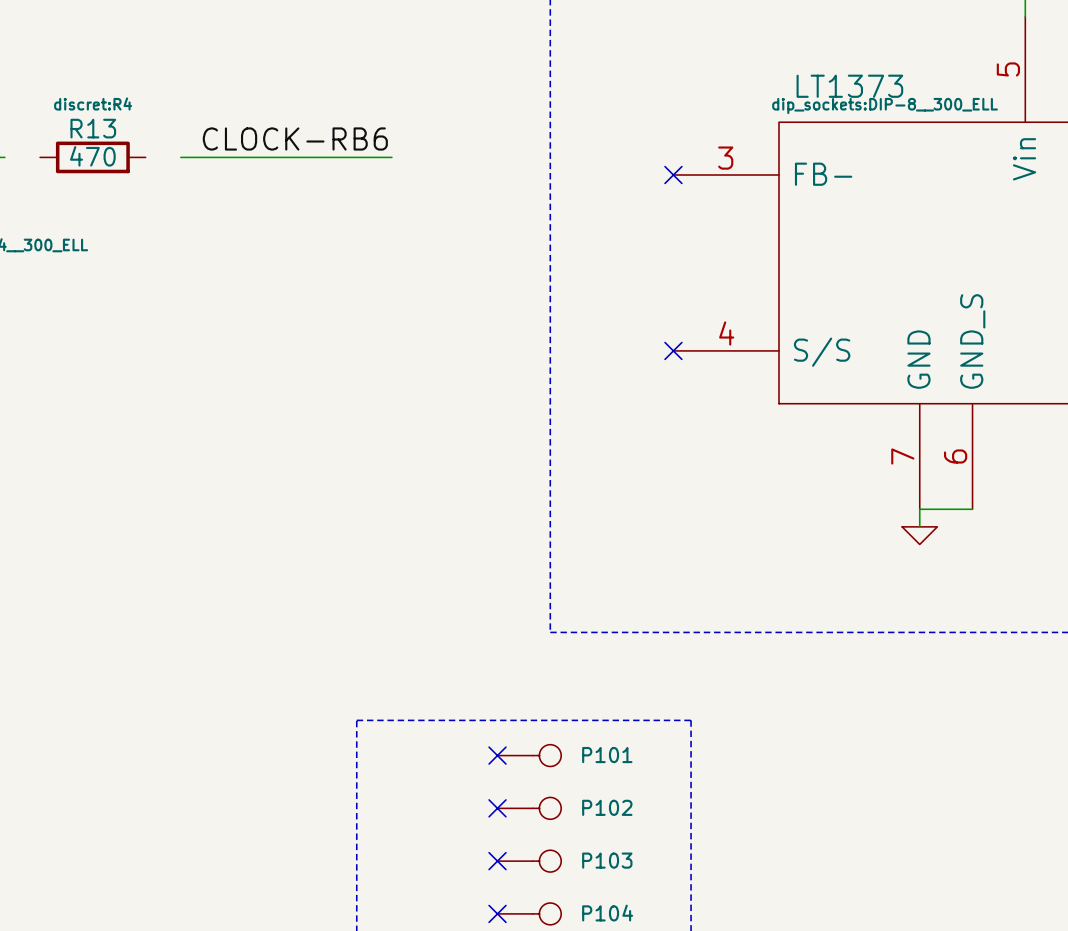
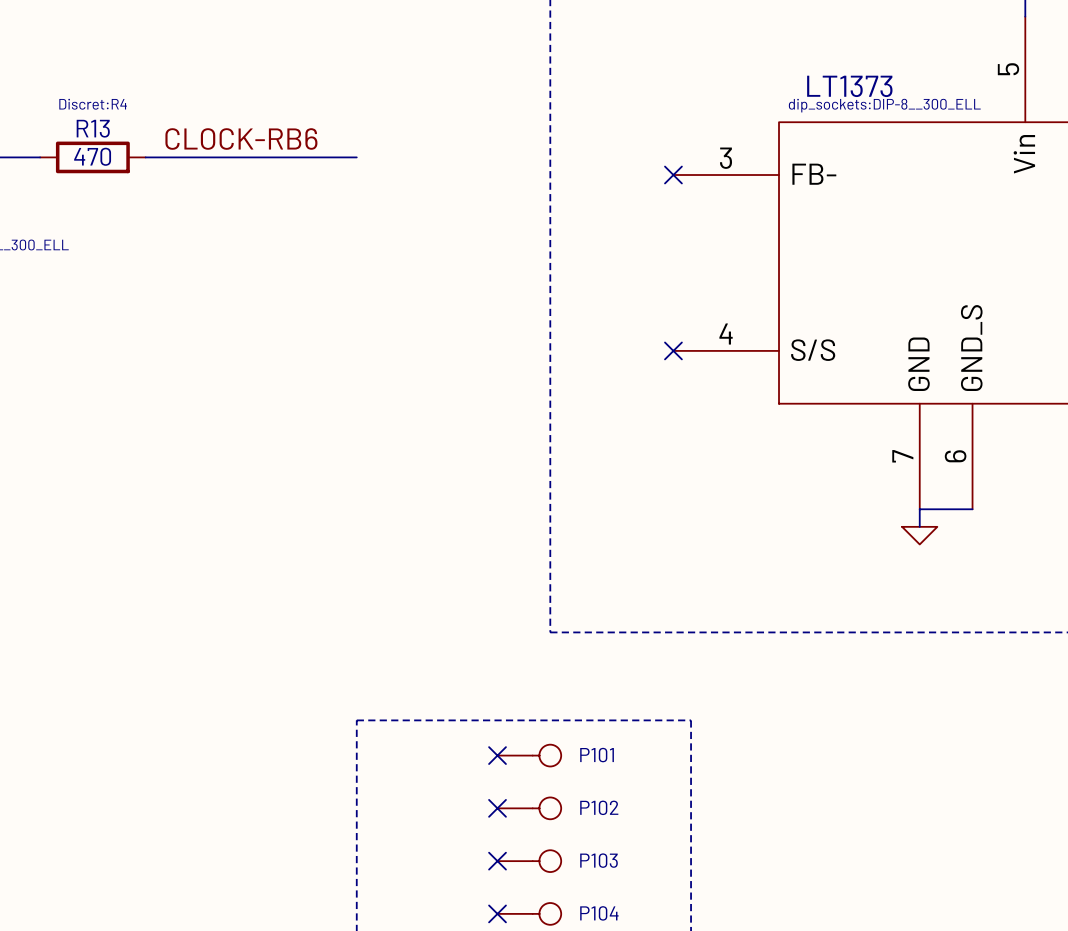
R13 text: discret:R4 (93, 103) -> Discret:R4 (93, 104)
label position: CLOCK-RB6 (295, 138) -> CLOCK-RB6 (241, 139)
wire: none -> (4, 157) (40, 157)
wire: (356, 157) (391, 157) -> (145, 157) (180, 157)

